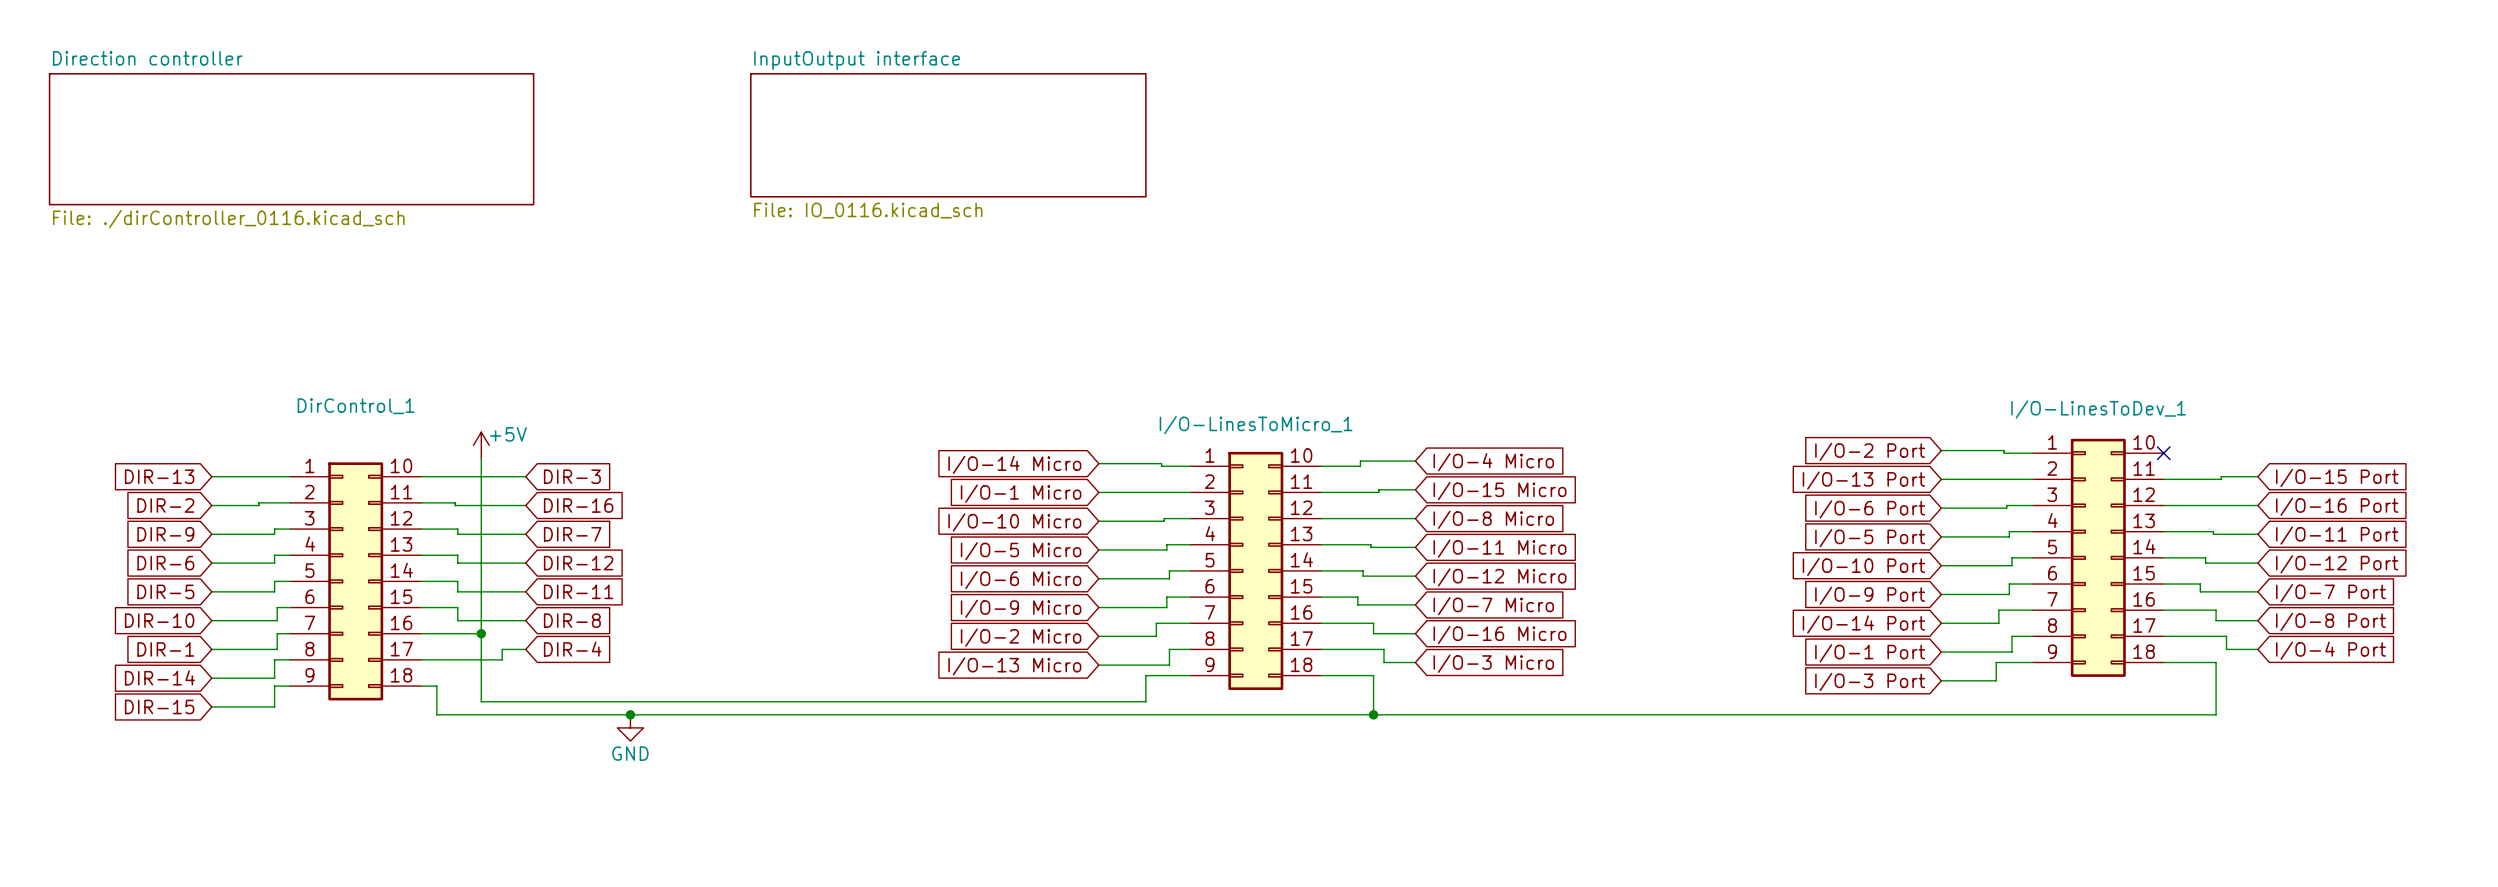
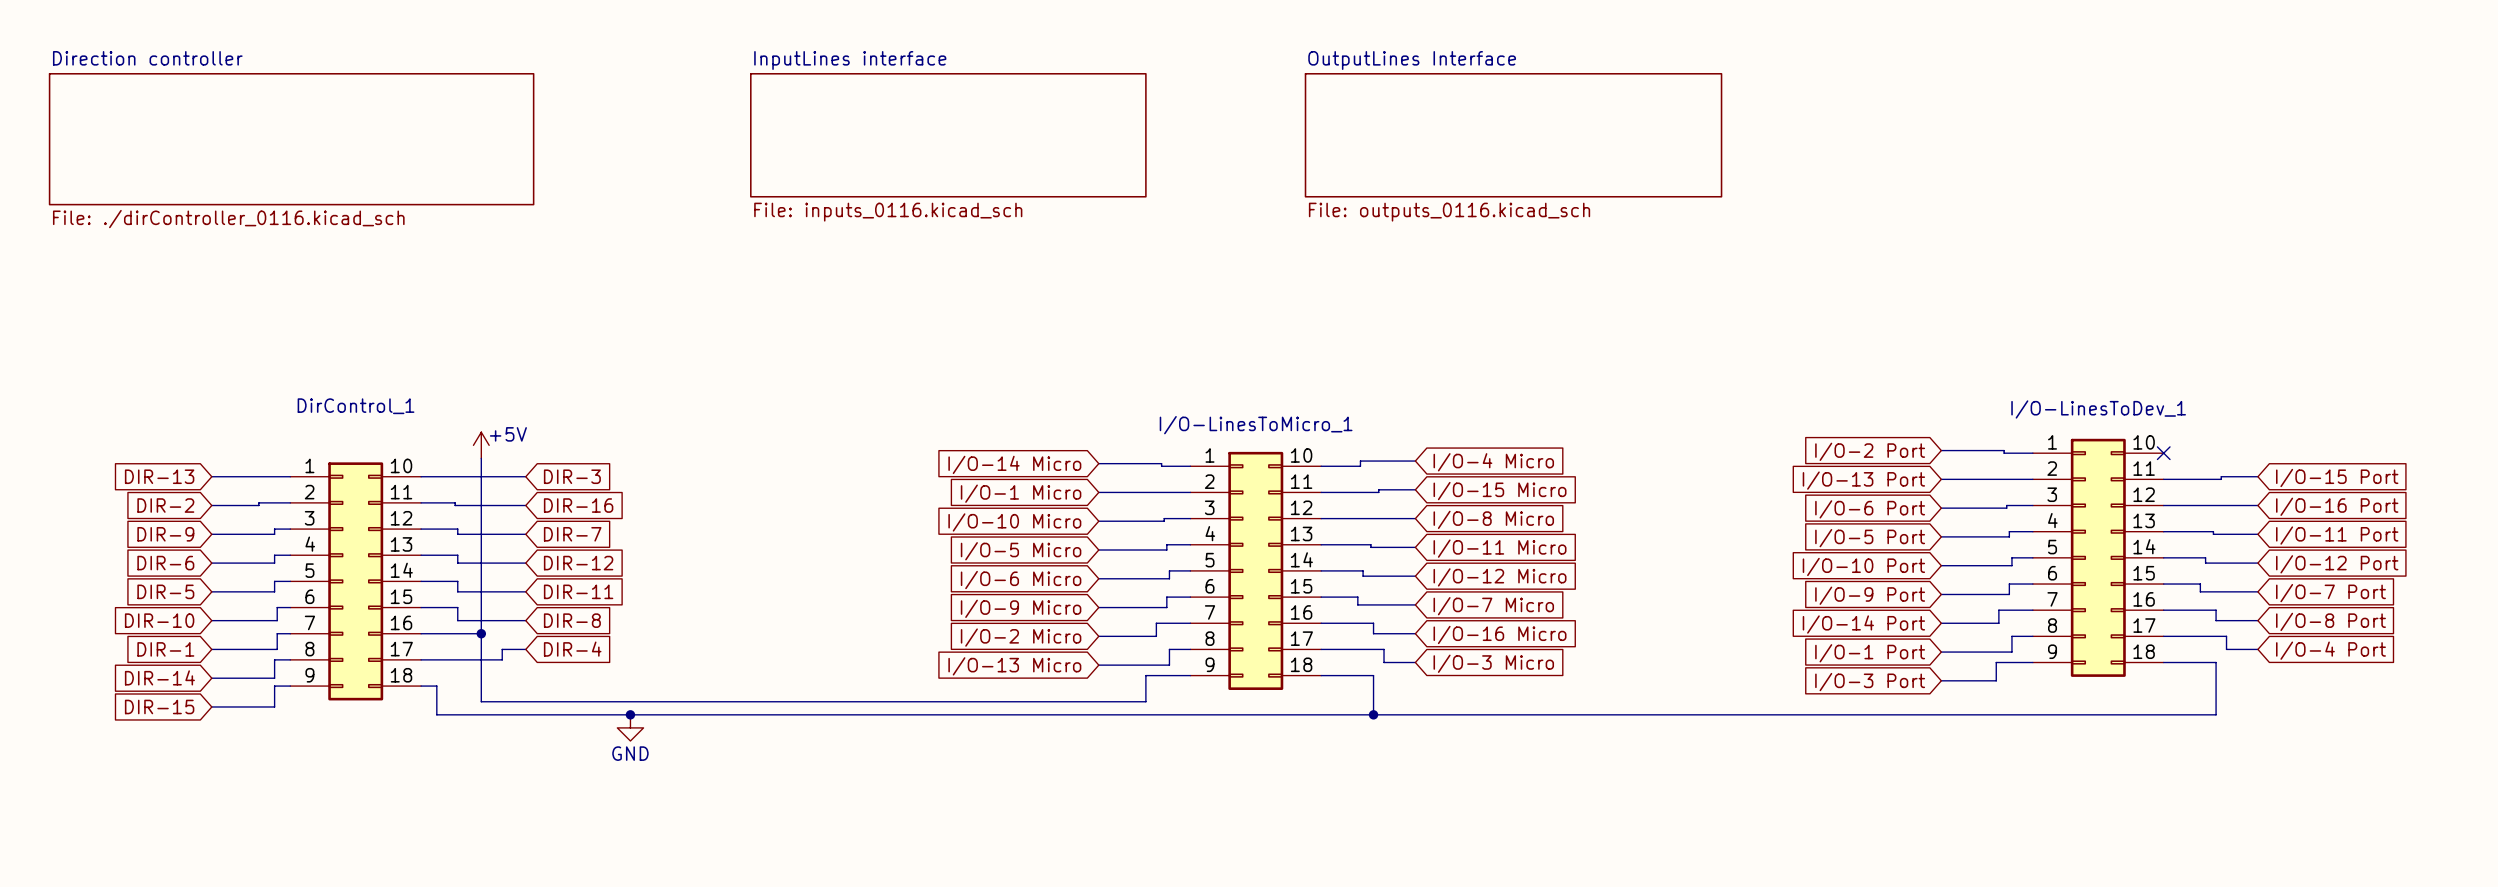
sheet InputOutput interface name: InputOutput interface (857, 60) -> InputLines interface (850, 60)
sheet OutputLines Interface: none -> File: outputs_0116.kicad_sch (1513, 135)
sheet InputOutput interface value: File: IO_0116.kicad_sch (868, 210) -> File: inputs_0116.kicad_sch (888, 212)

